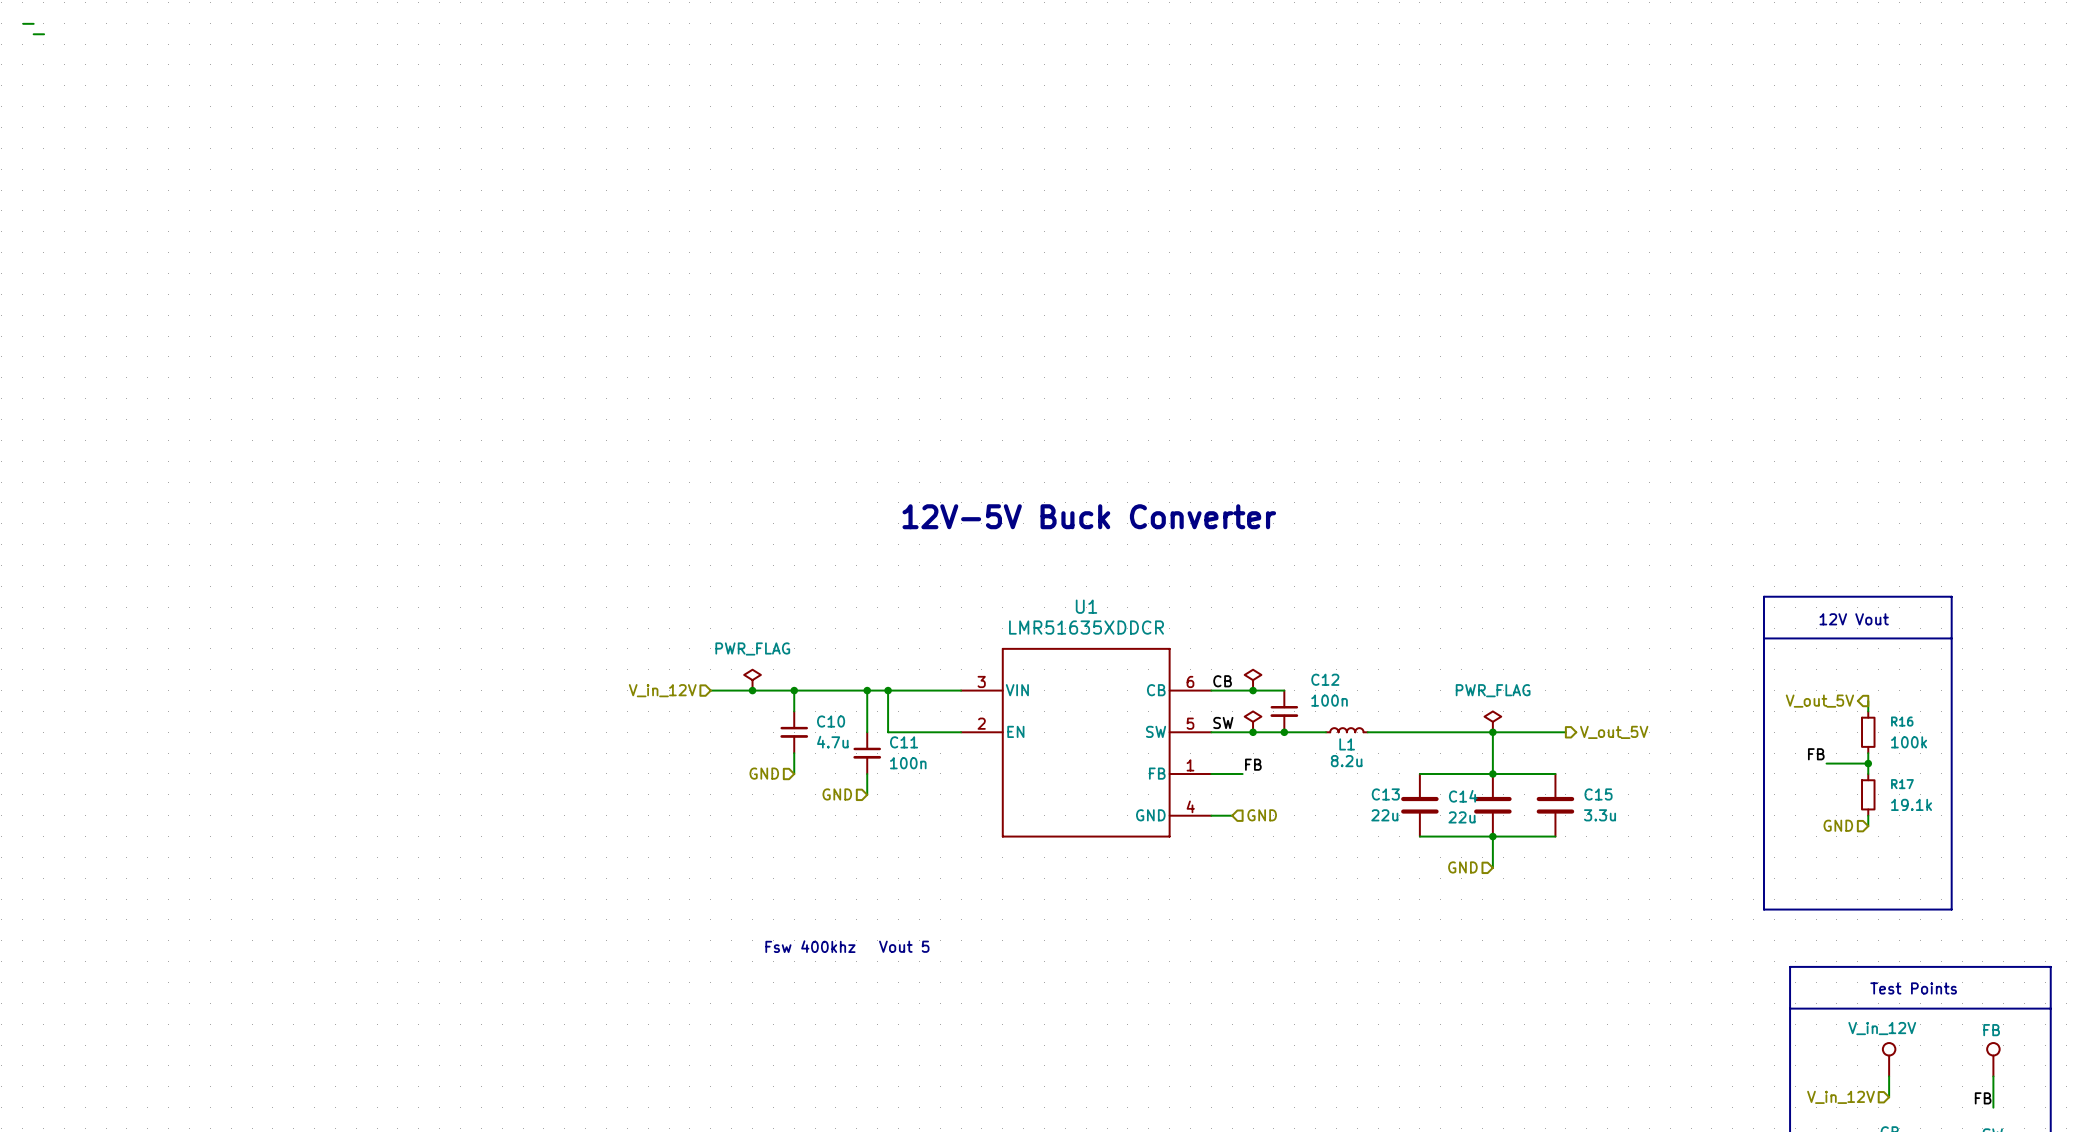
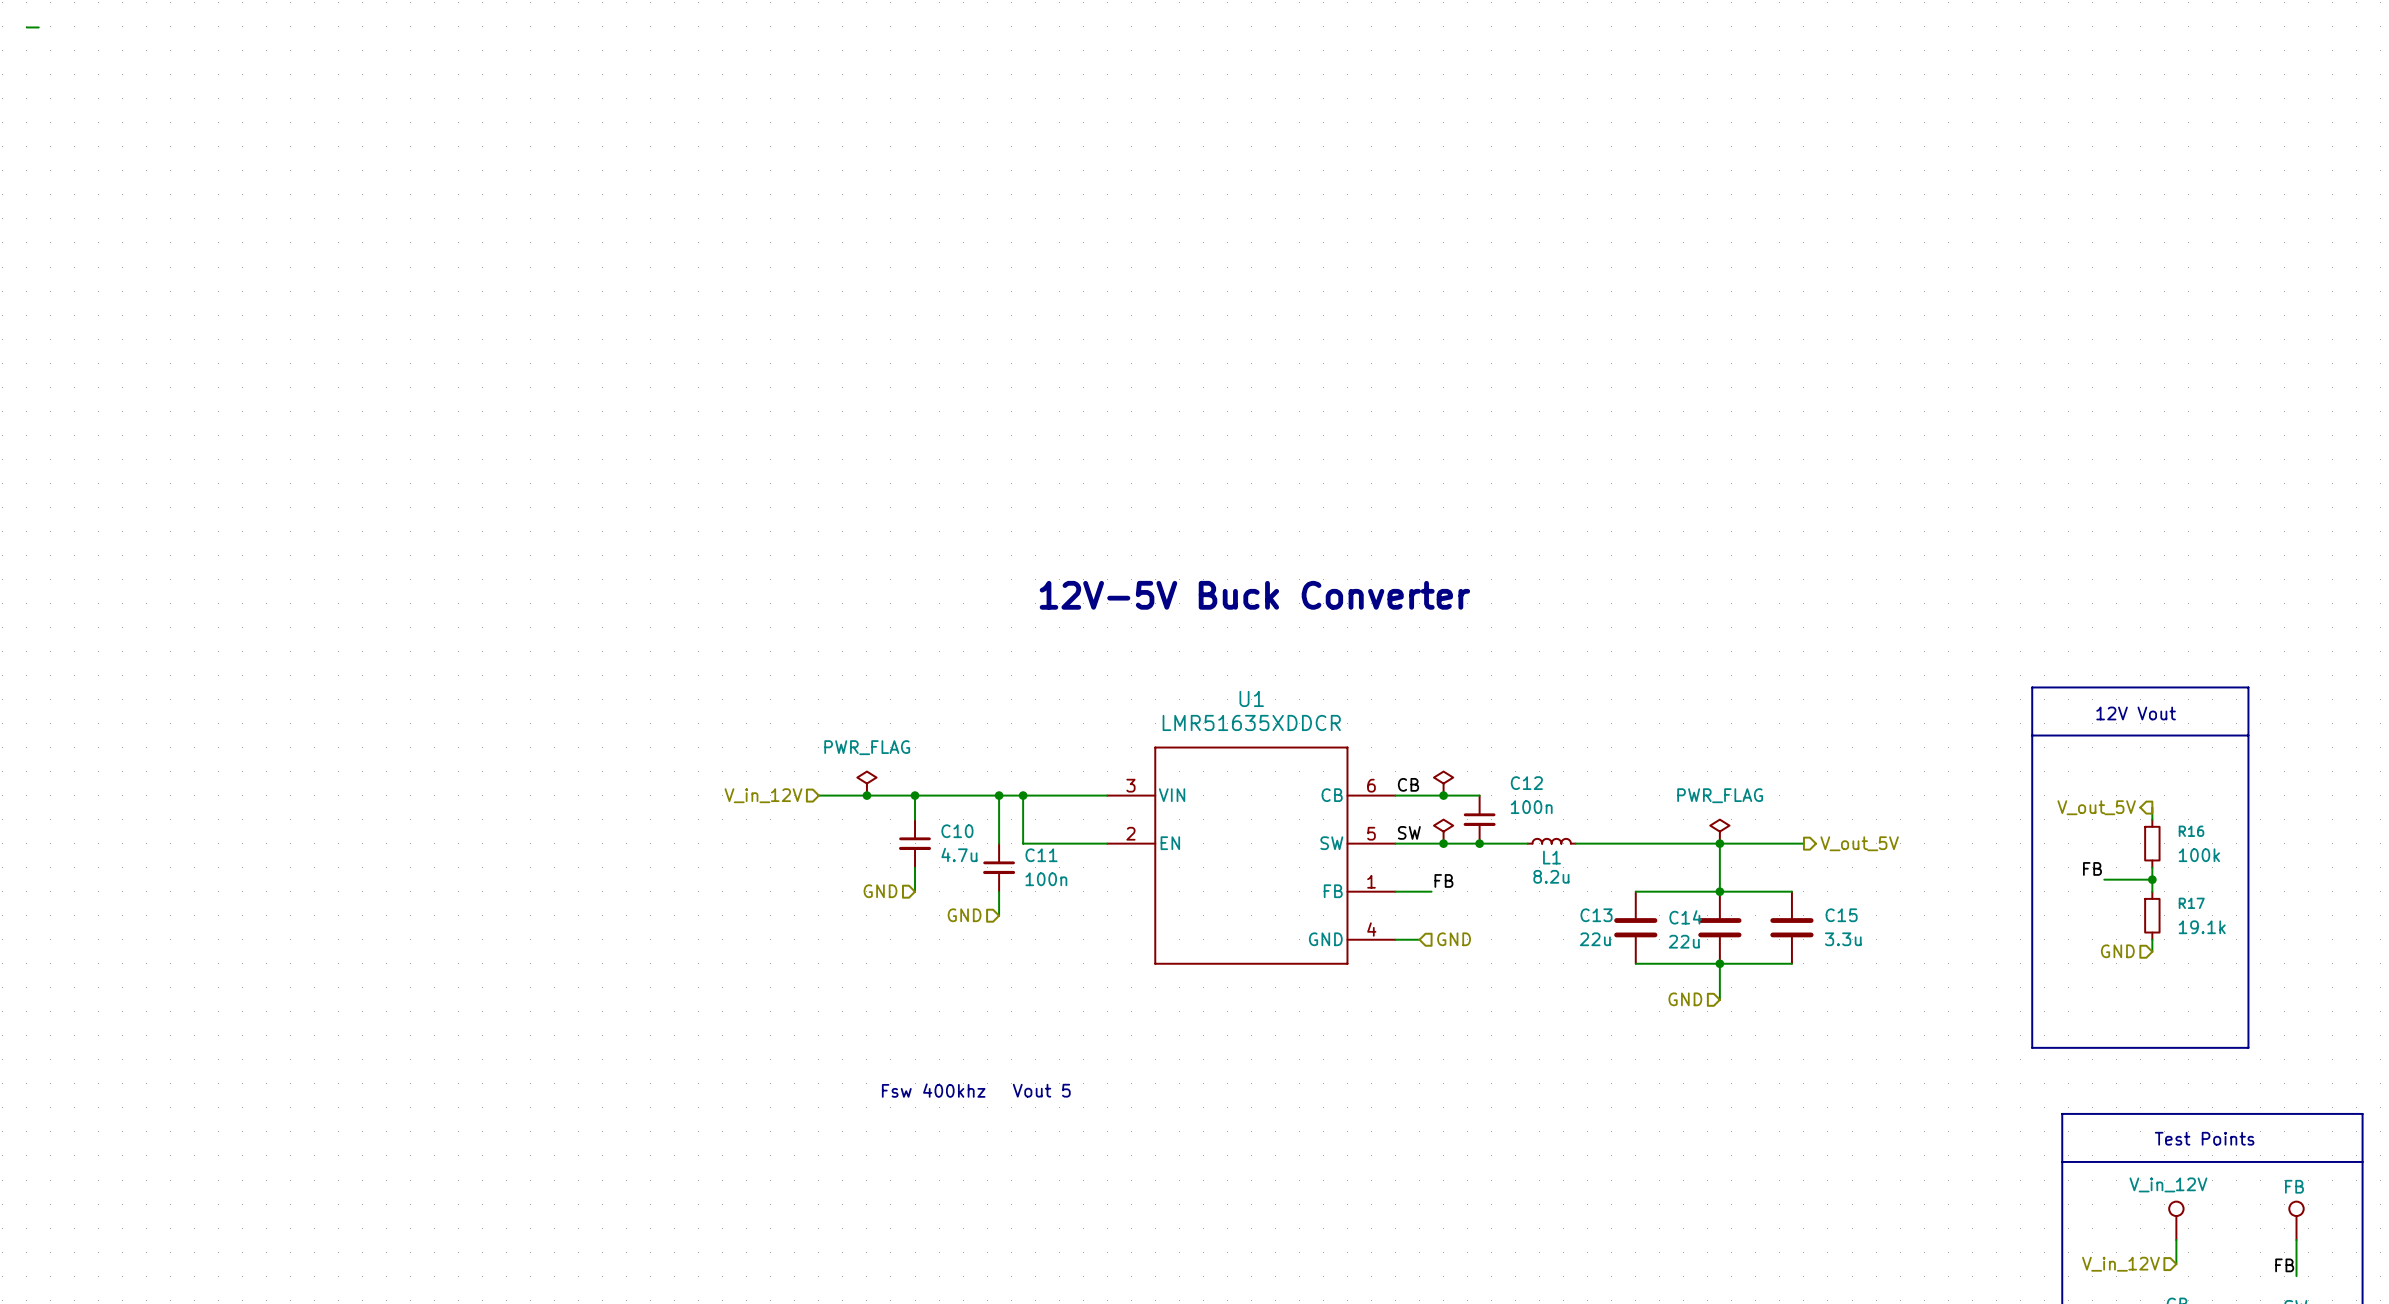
wire: (33, 34) (44, 34) -> none

